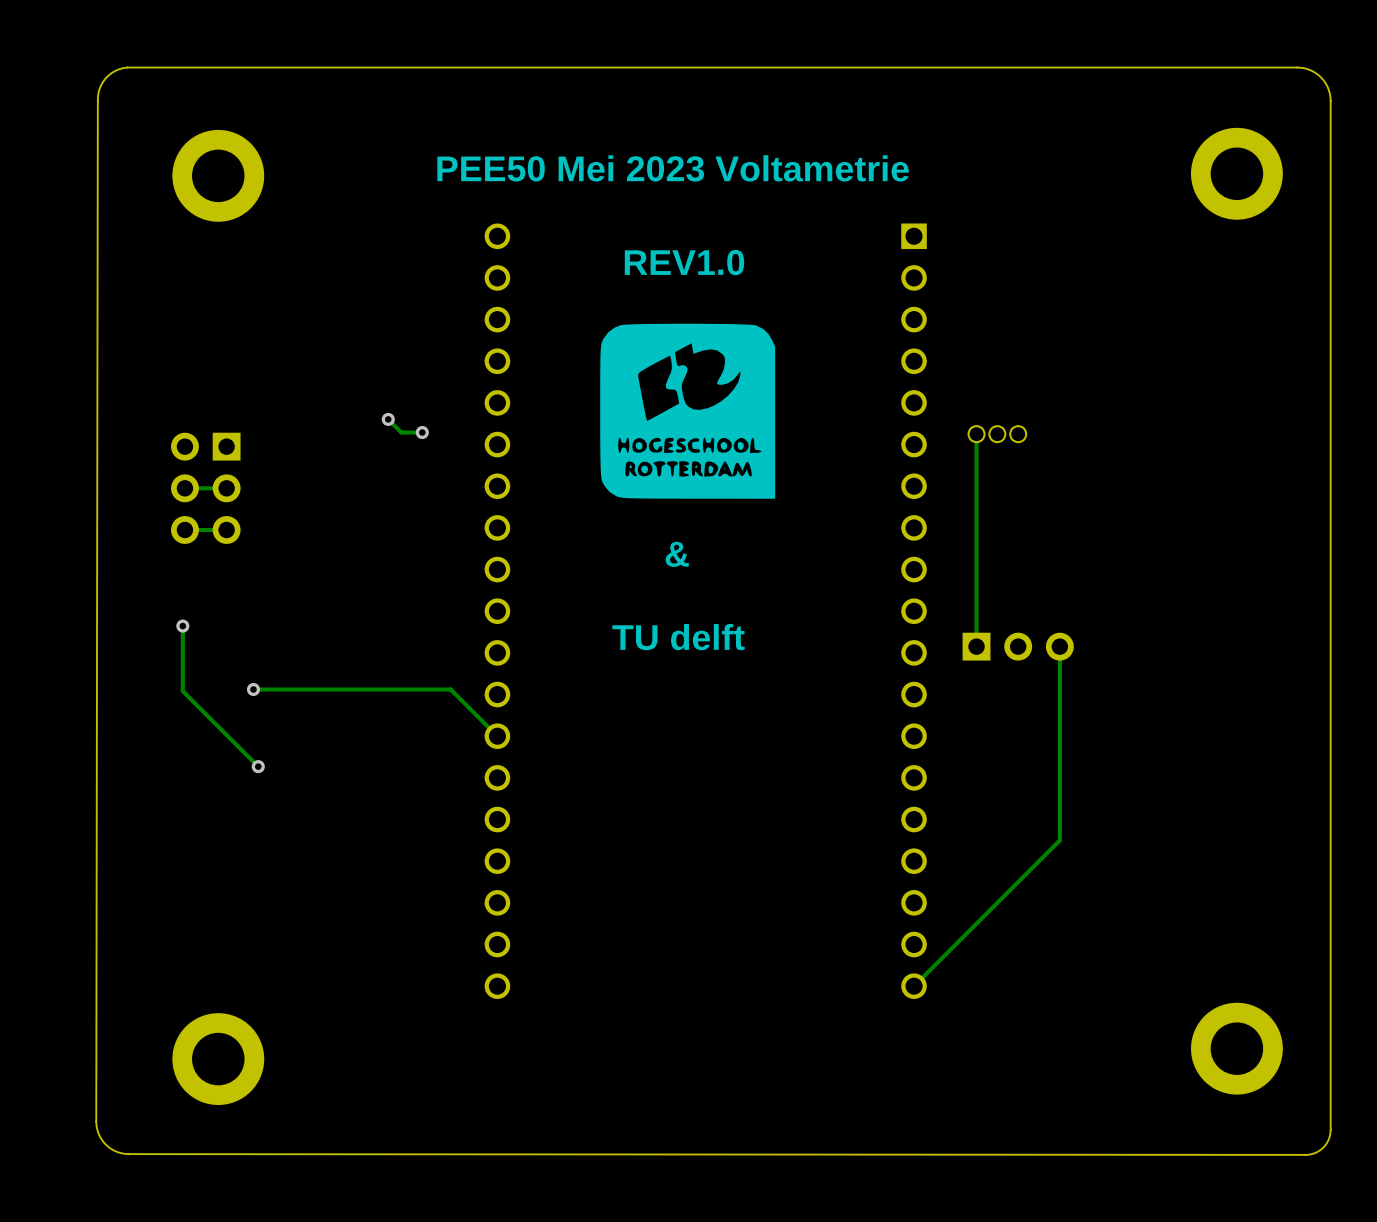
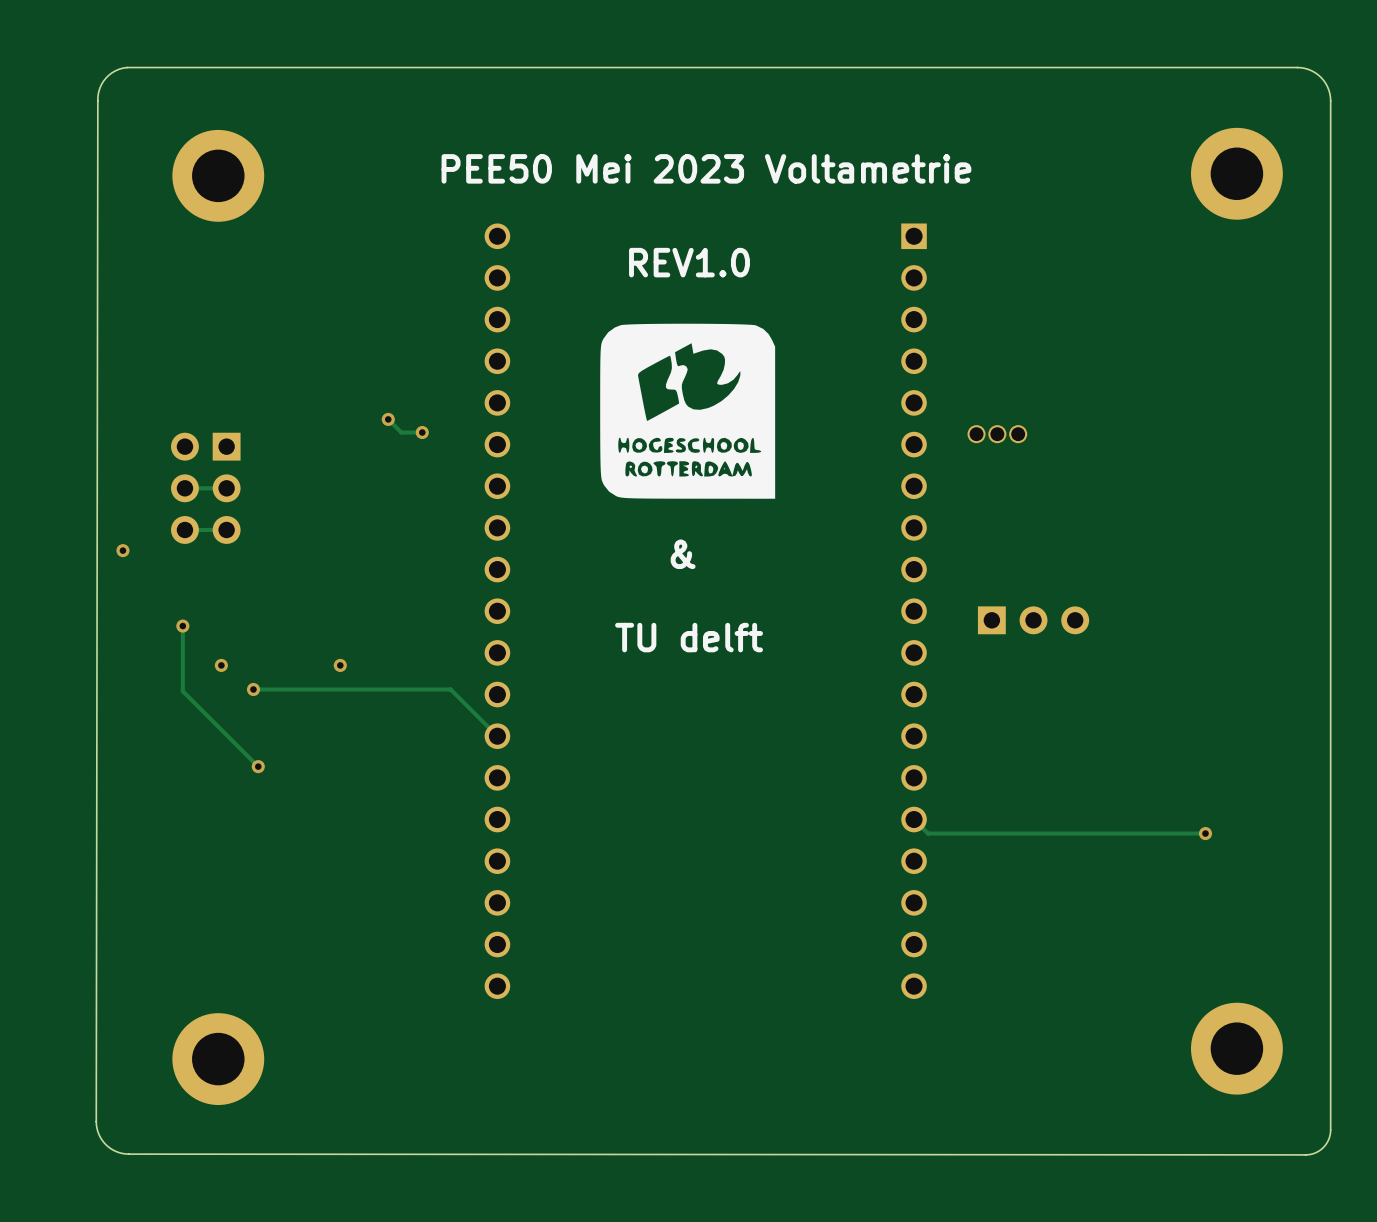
track: (976, 434) (976, 646) -> none
via: none -> (122, 550)
part position: (1018, 646) -> (1033, 620)
track: (1059, 646) (1059, 840) (914, 986) -> none
via: none -> (221, 665)
via: none -> (340, 665)
track: none -> (914, 819) (928, 833) (1205, 833)
via: none -> (1205, 833)

